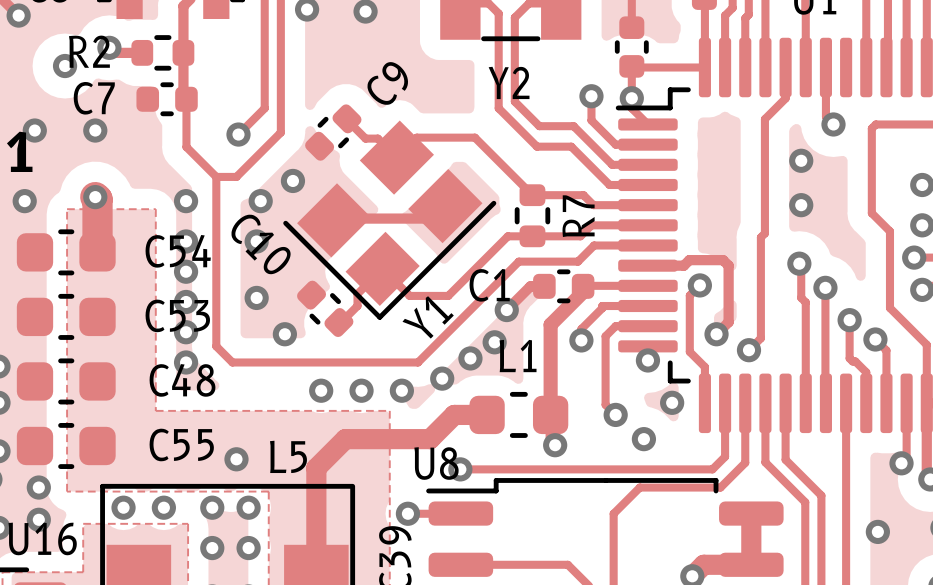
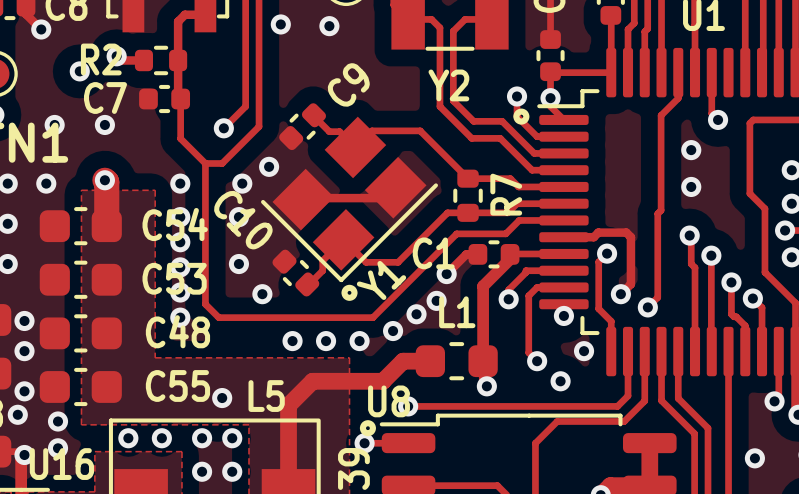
drawing: none -> [513, 108, 530, 125]
drawing: none -> [341, 284, 358, 301]
drawing: none -> [359, 420, 376, 437]

